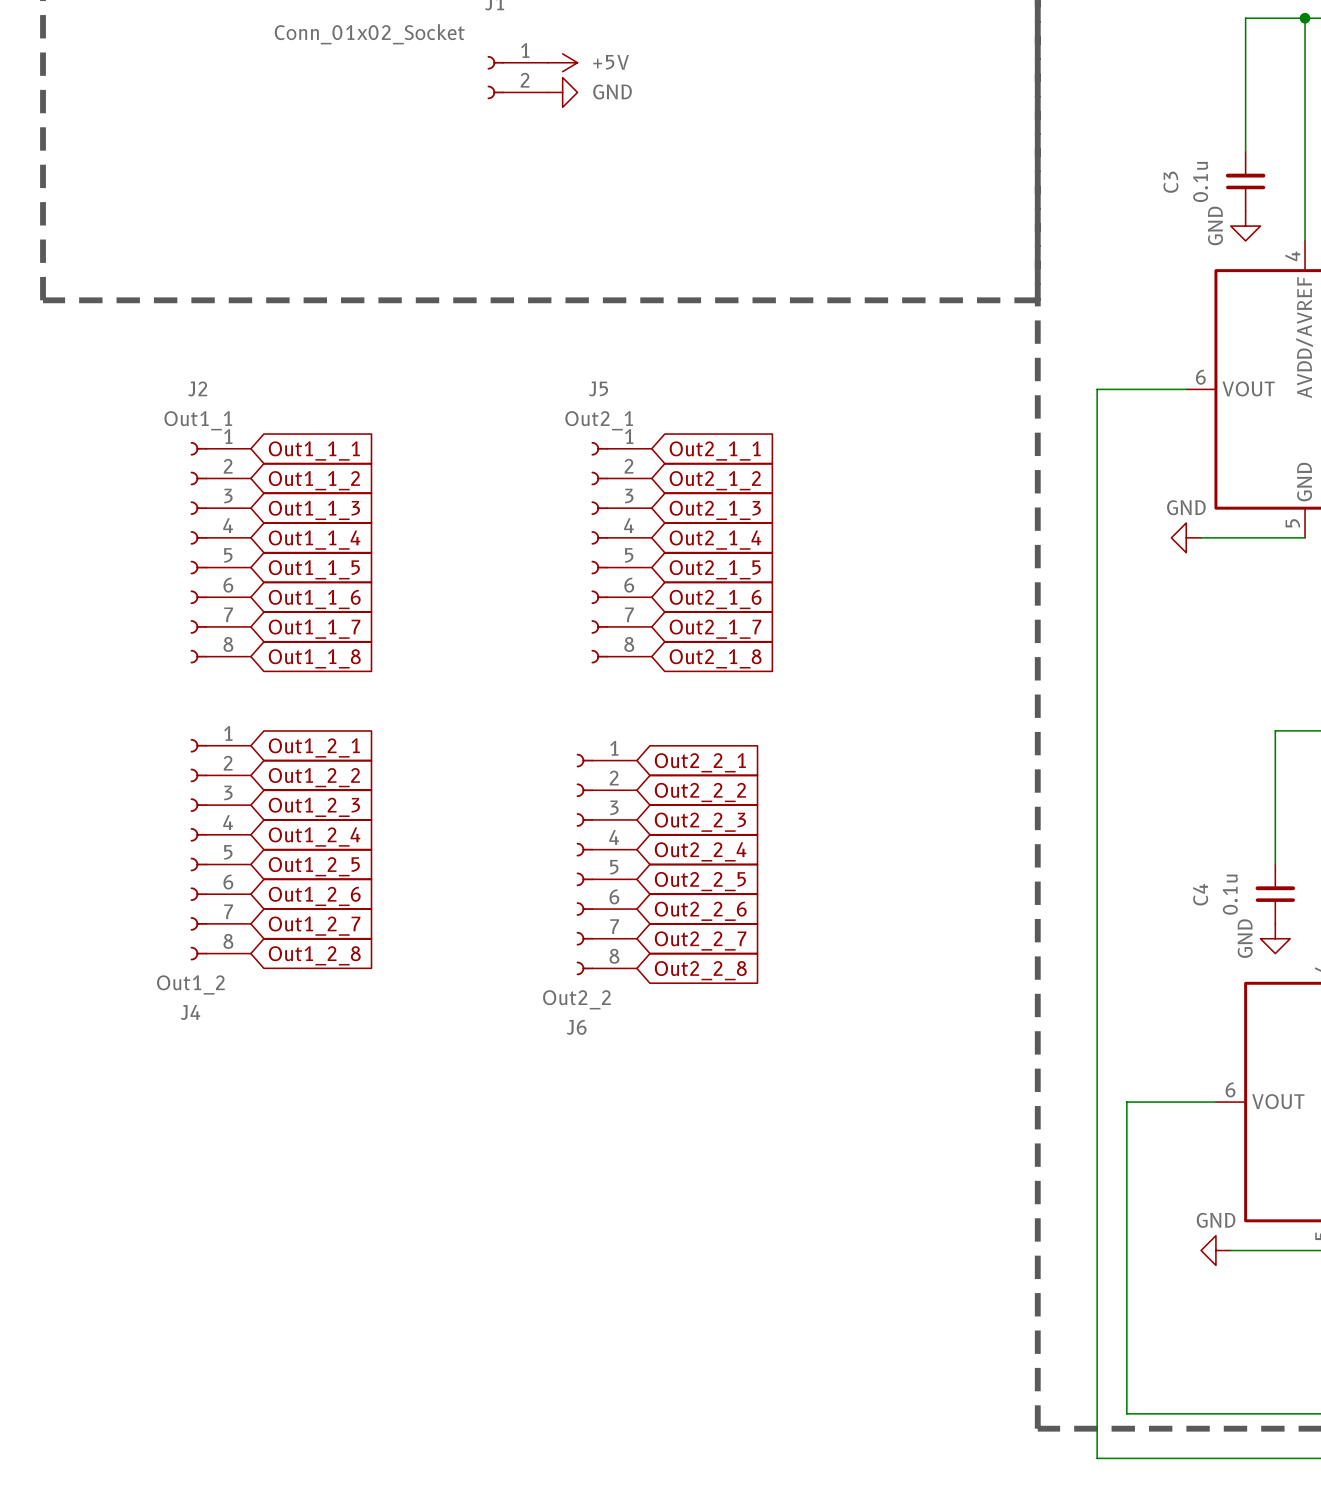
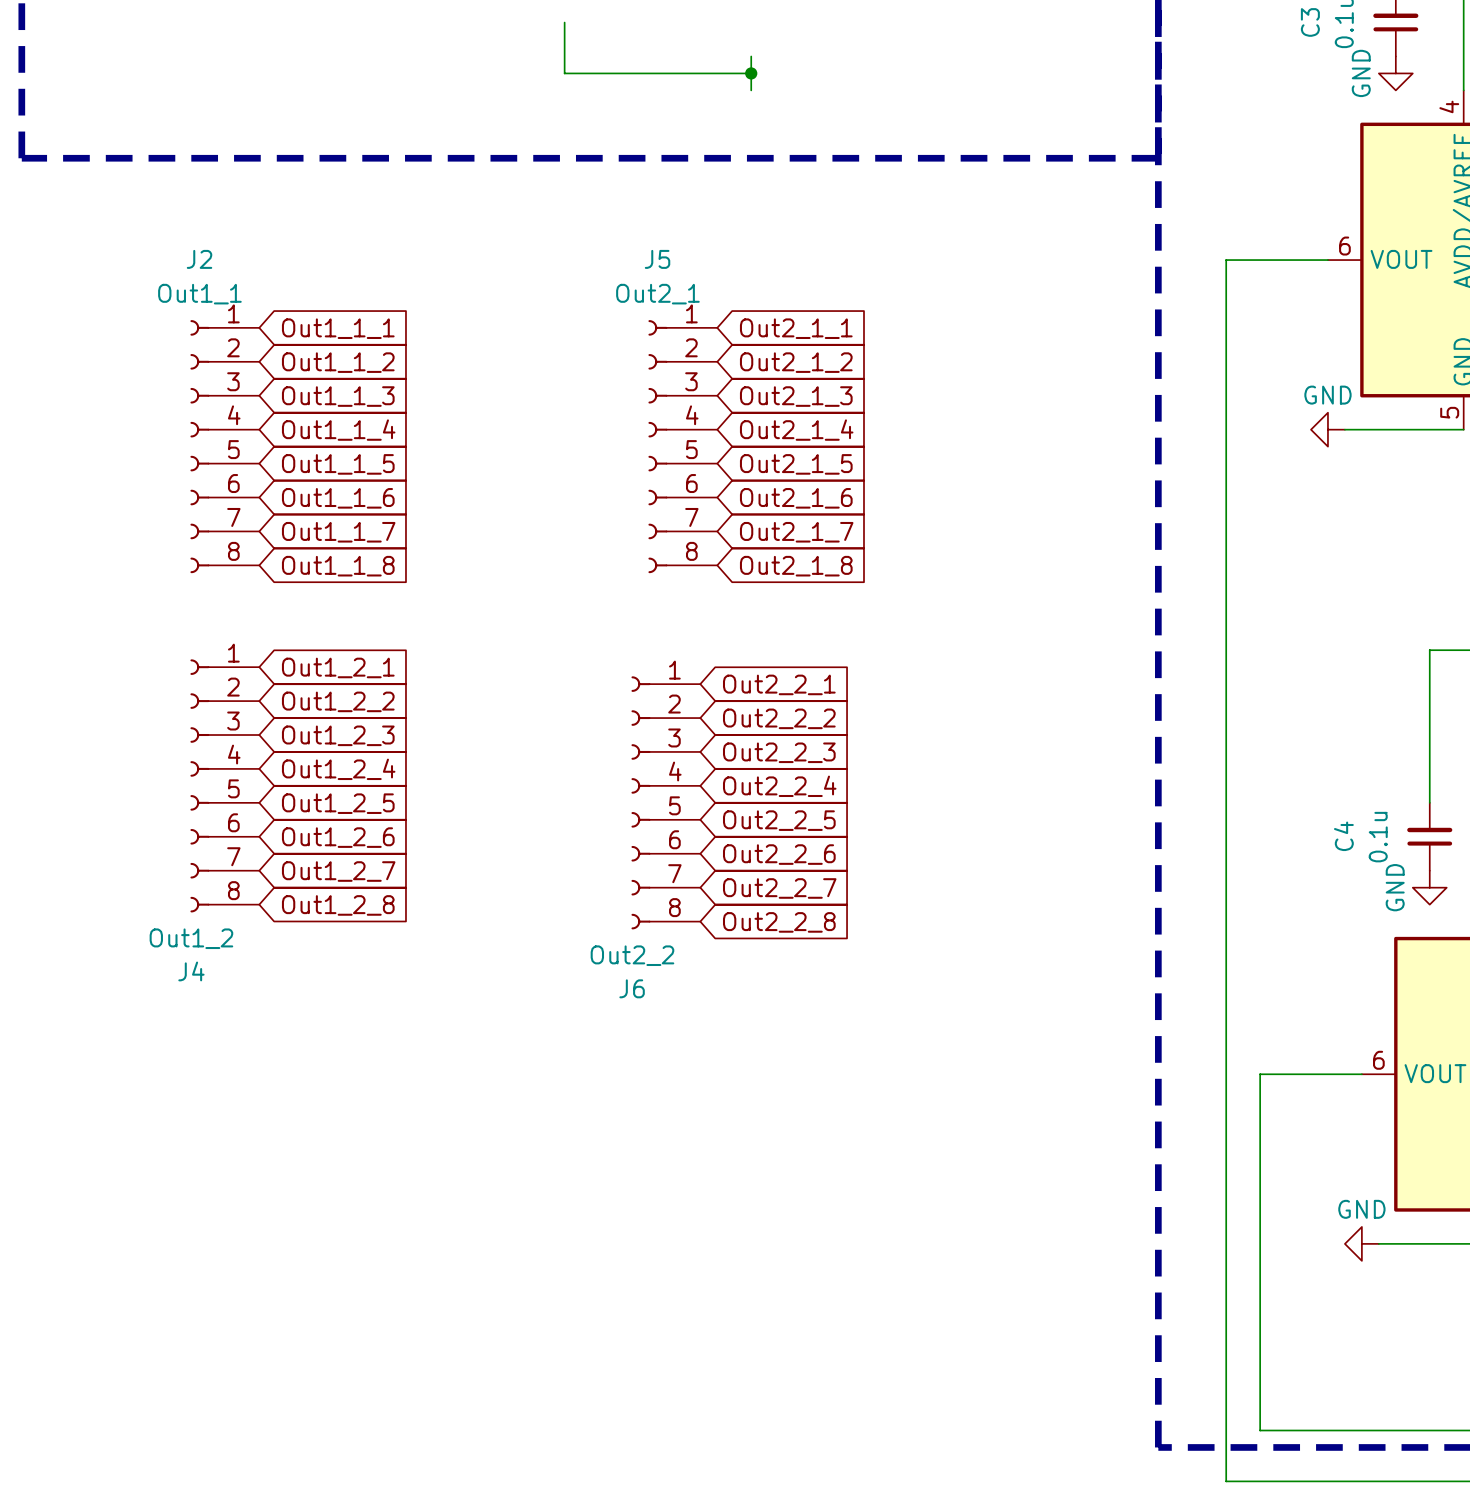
wire: none -> (564, 22) (564, 73) (751, 73)
wire: none -> (751, 56) (751, 90)
junction: none -> (751, 73)

